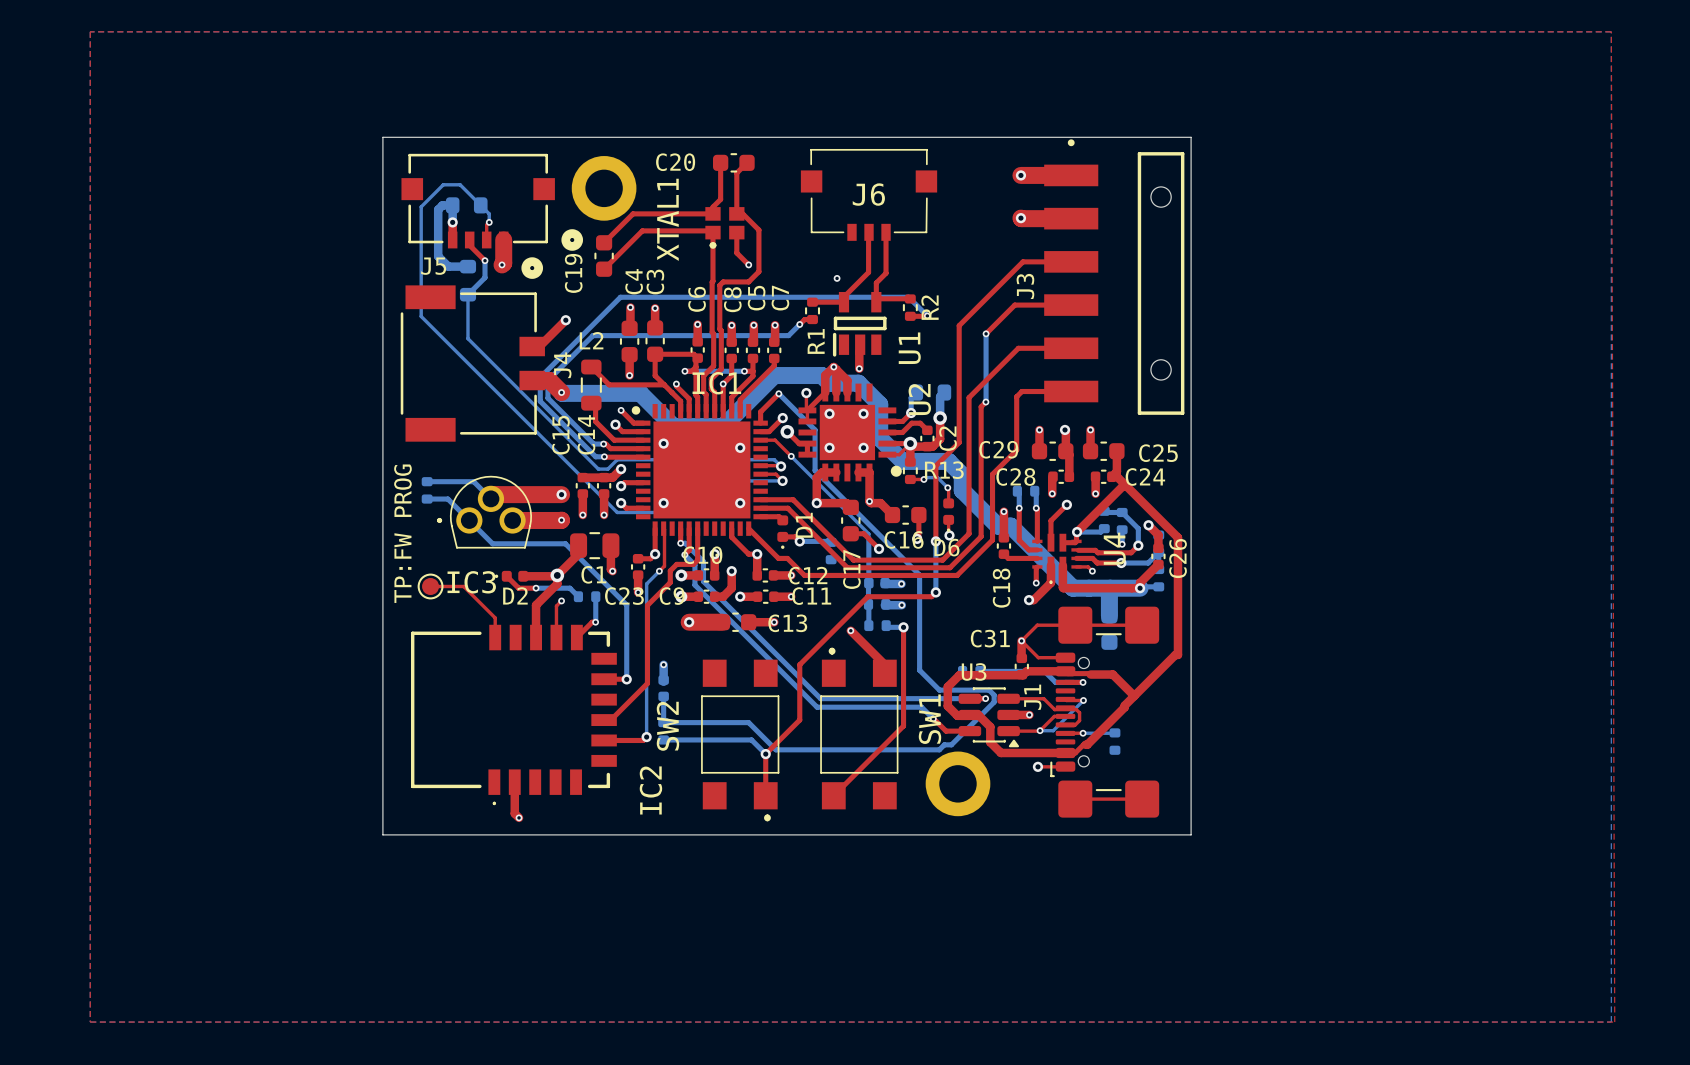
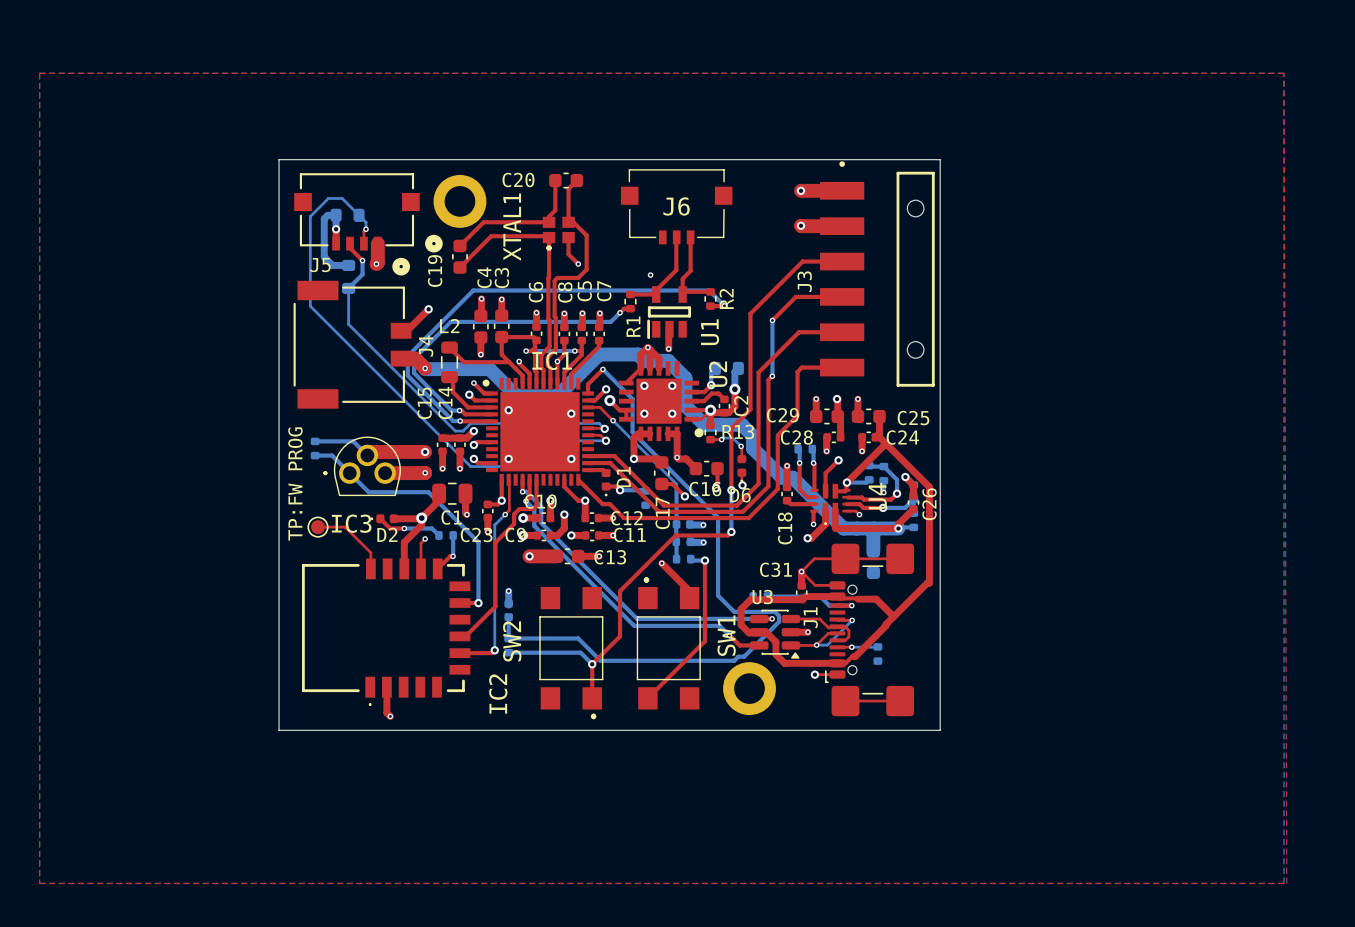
top track: (806, 393) (807, 421) -> none
via: (806, 393) -> none

